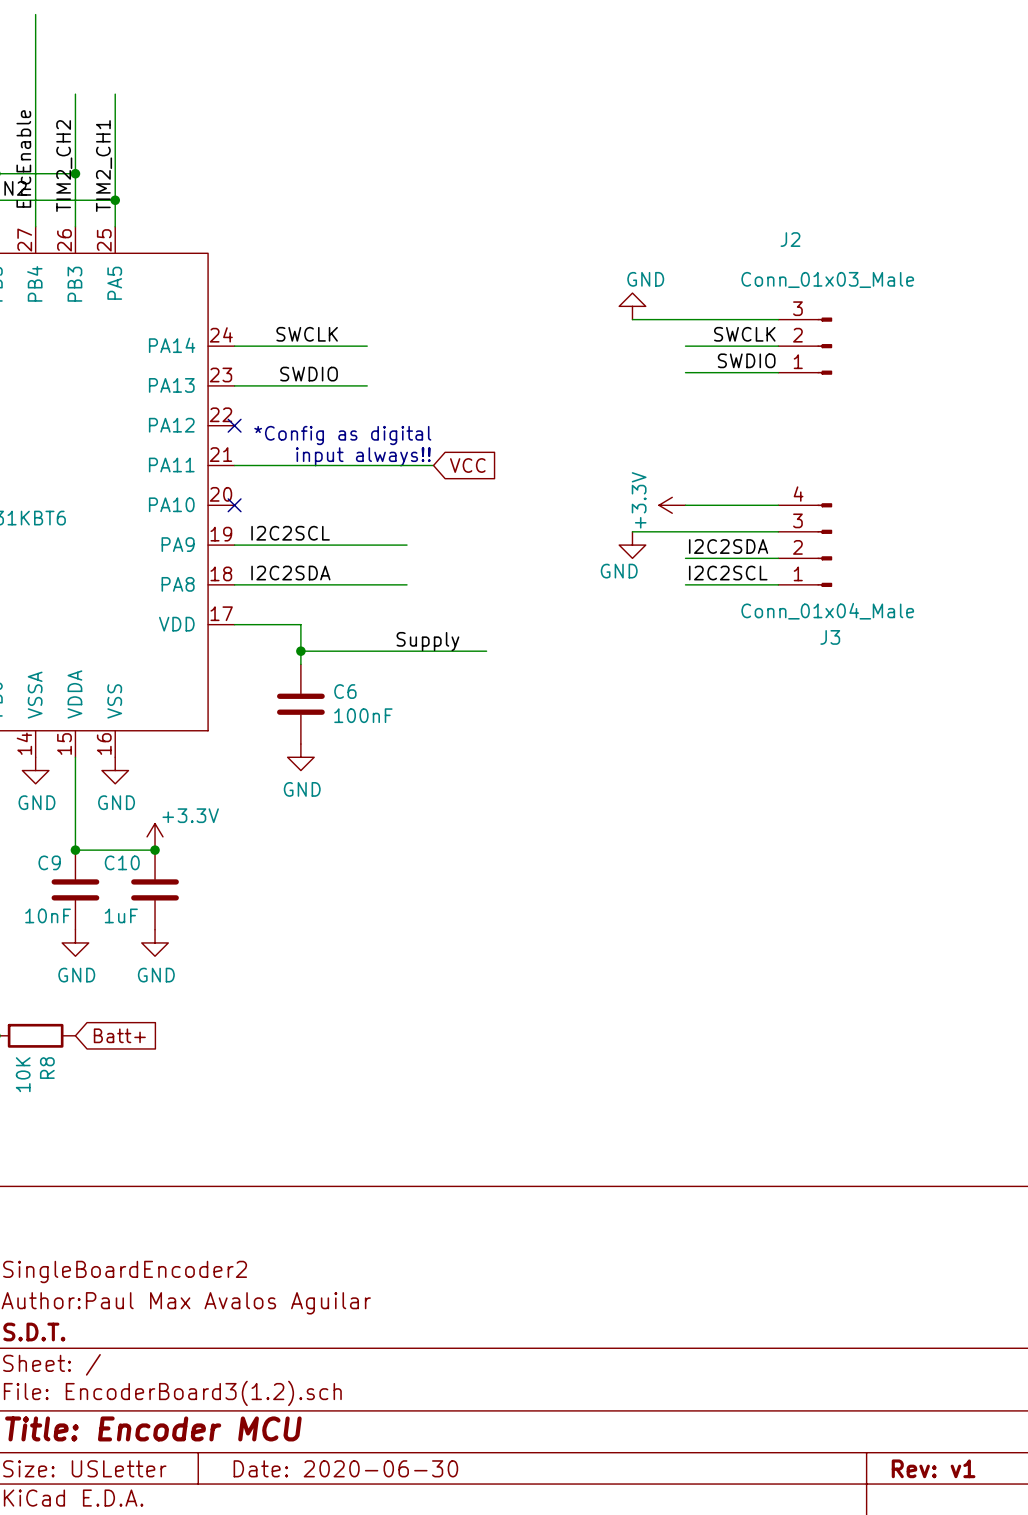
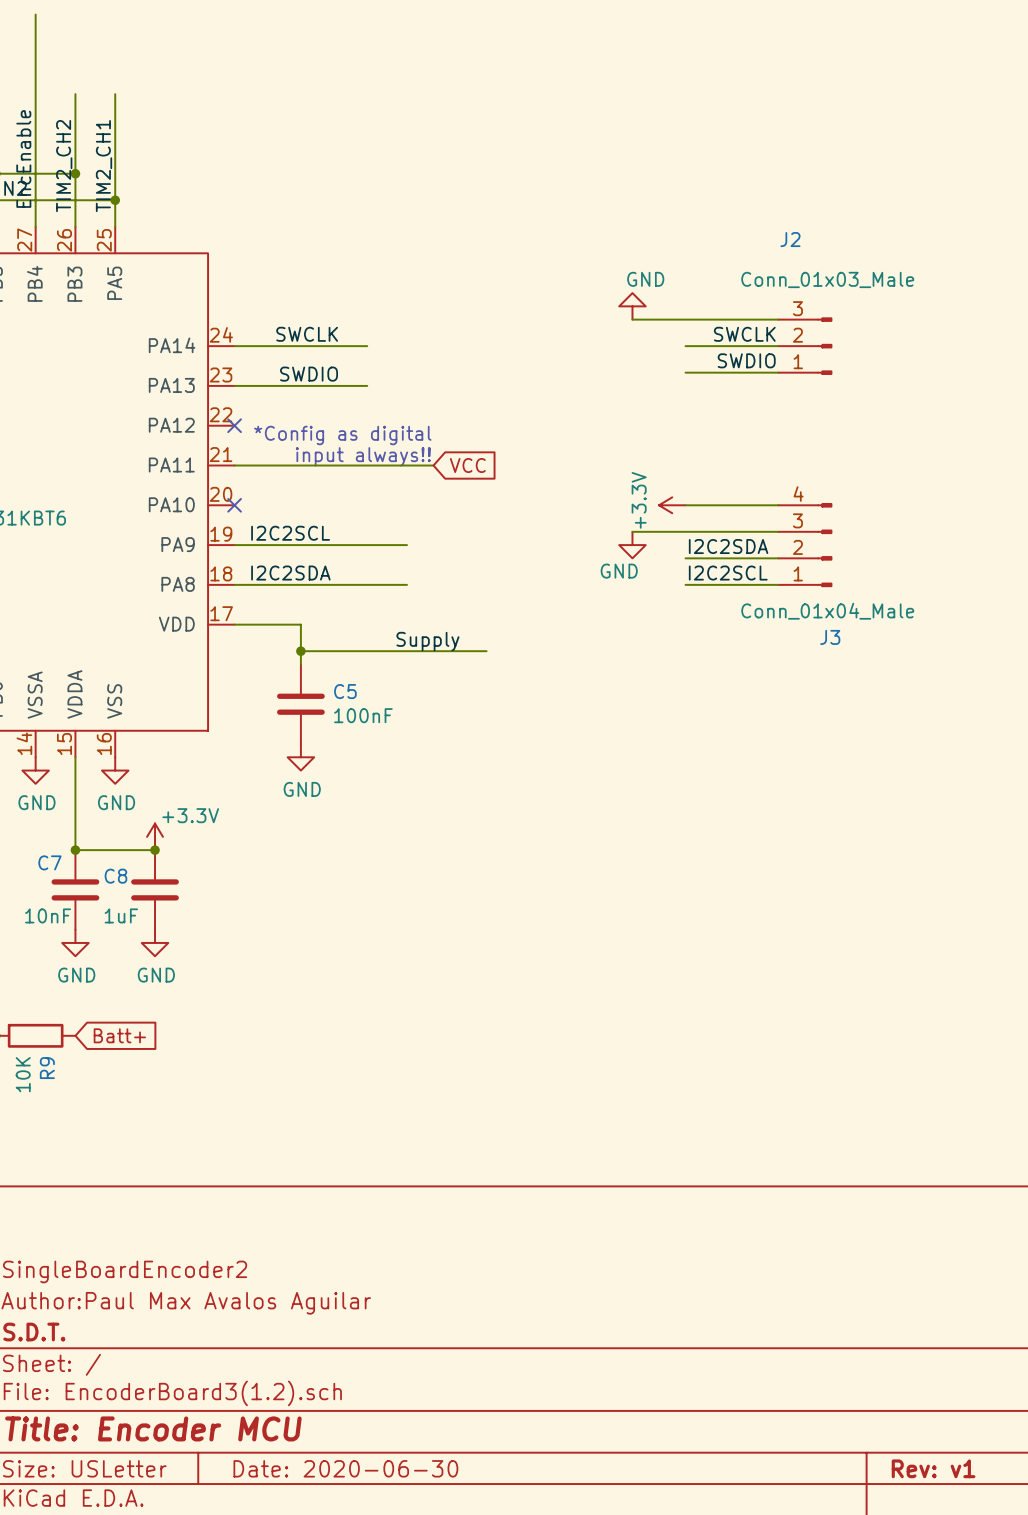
C6 name: C6 (345, 691) -> C5 (345, 691)
C9 name: C9 (49, 862) -> C7 (49, 862)
C10 name: C10 (122, 862) -> C8 (115, 876)
R8 name: R8 (47, 1068) -> R9 (47, 1068)

